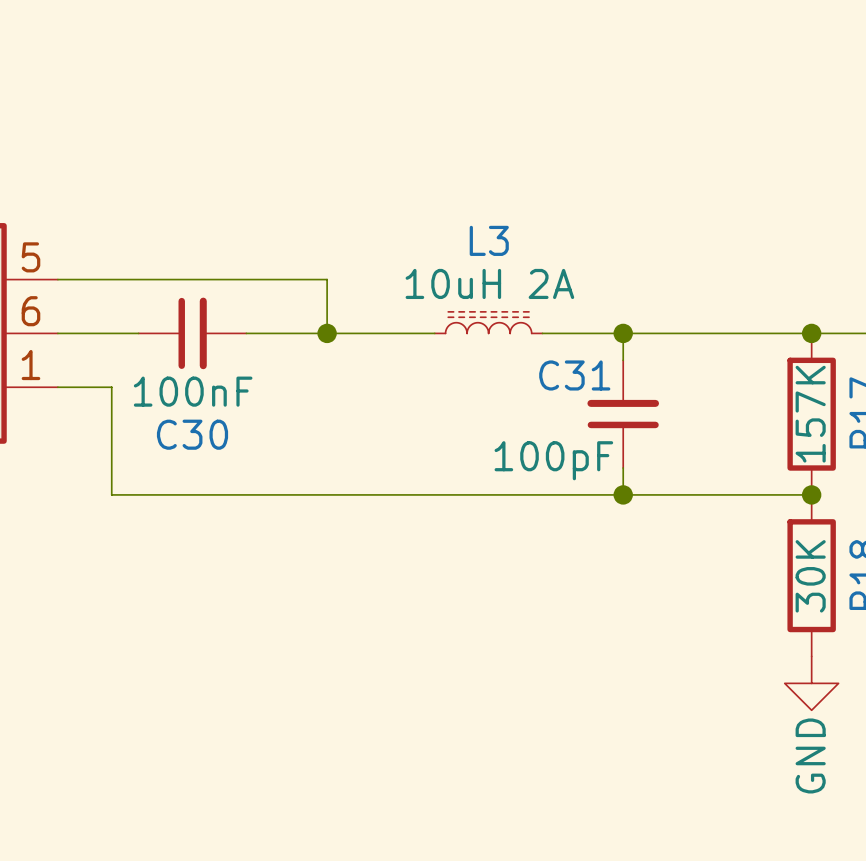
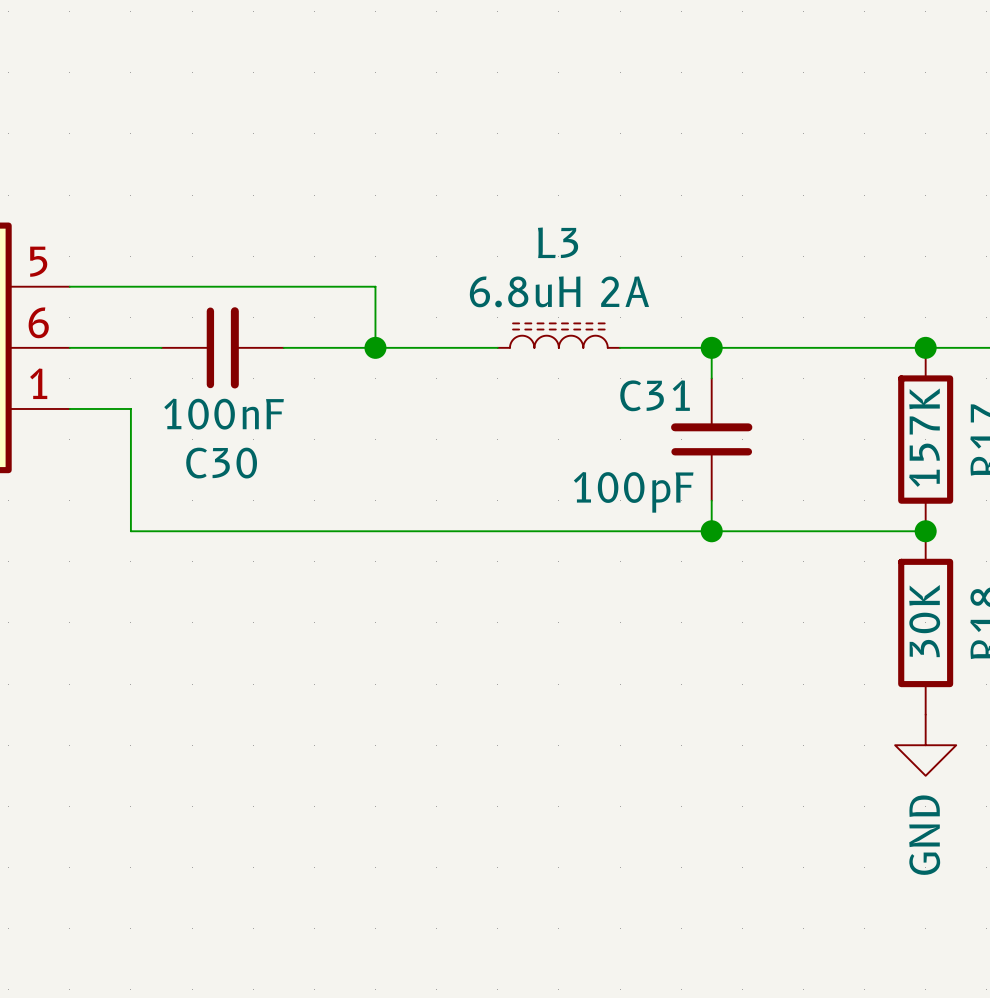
L3 value: 10uH 2A (489, 283) -> 6.8uH 2A (559, 291)

